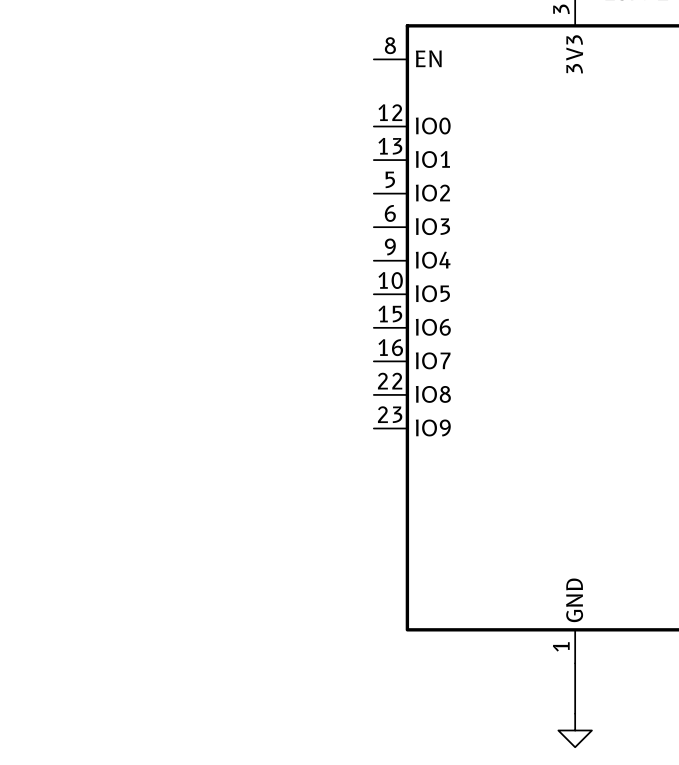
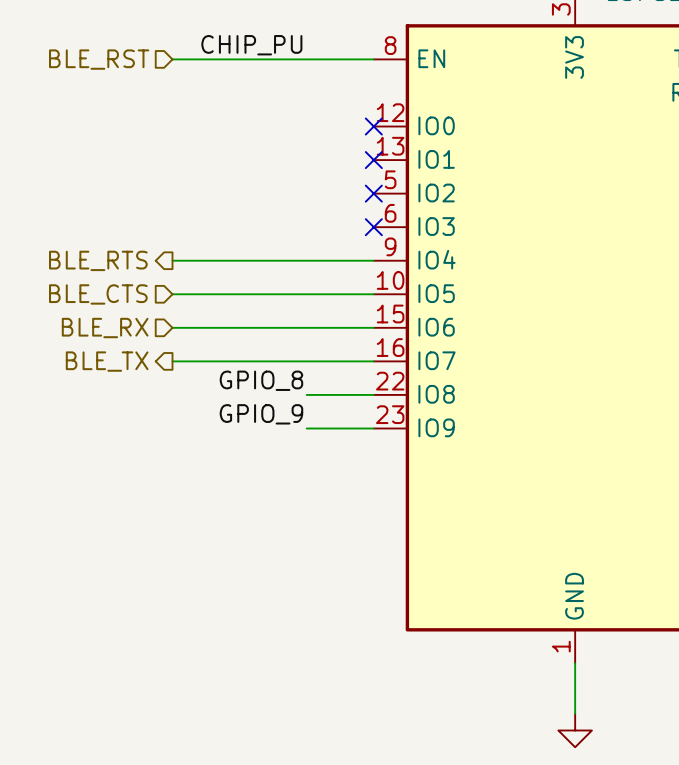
label: none -> CHIP_PU (251, 45)
wire: none -> (172, 59) (373, 59)
hierarchical label: none -> BLE_RST (99, 59)
no-connect mark: none -> (373, 126)
no-connect mark: none -> (373, 160)
no-connect mark: none -> (373, 193)
no-connect mark: none -> (373, 227)
wire: none -> (172, 260) (373, 260)
hierarchical label: none -> BLE_RTS (98, 260)
wire: none -> (172, 294) (373, 294)
hierarchical label: none -> BLE_CTS (98, 294)
wire: none -> (172, 327) (373, 327)
hierarchical label: none -> BLE_RX (105, 328)
wire: none -> (172, 361) (373, 361)
hierarchical label: none -> BLE_TX (107, 361)
label: none -> GPIO_8 (261, 380)
wire: none -> (306, 394) (373, 394)
label: none -> GPIO_9 (261, 414)
wire: none -> (306, 428) (373, 428)

